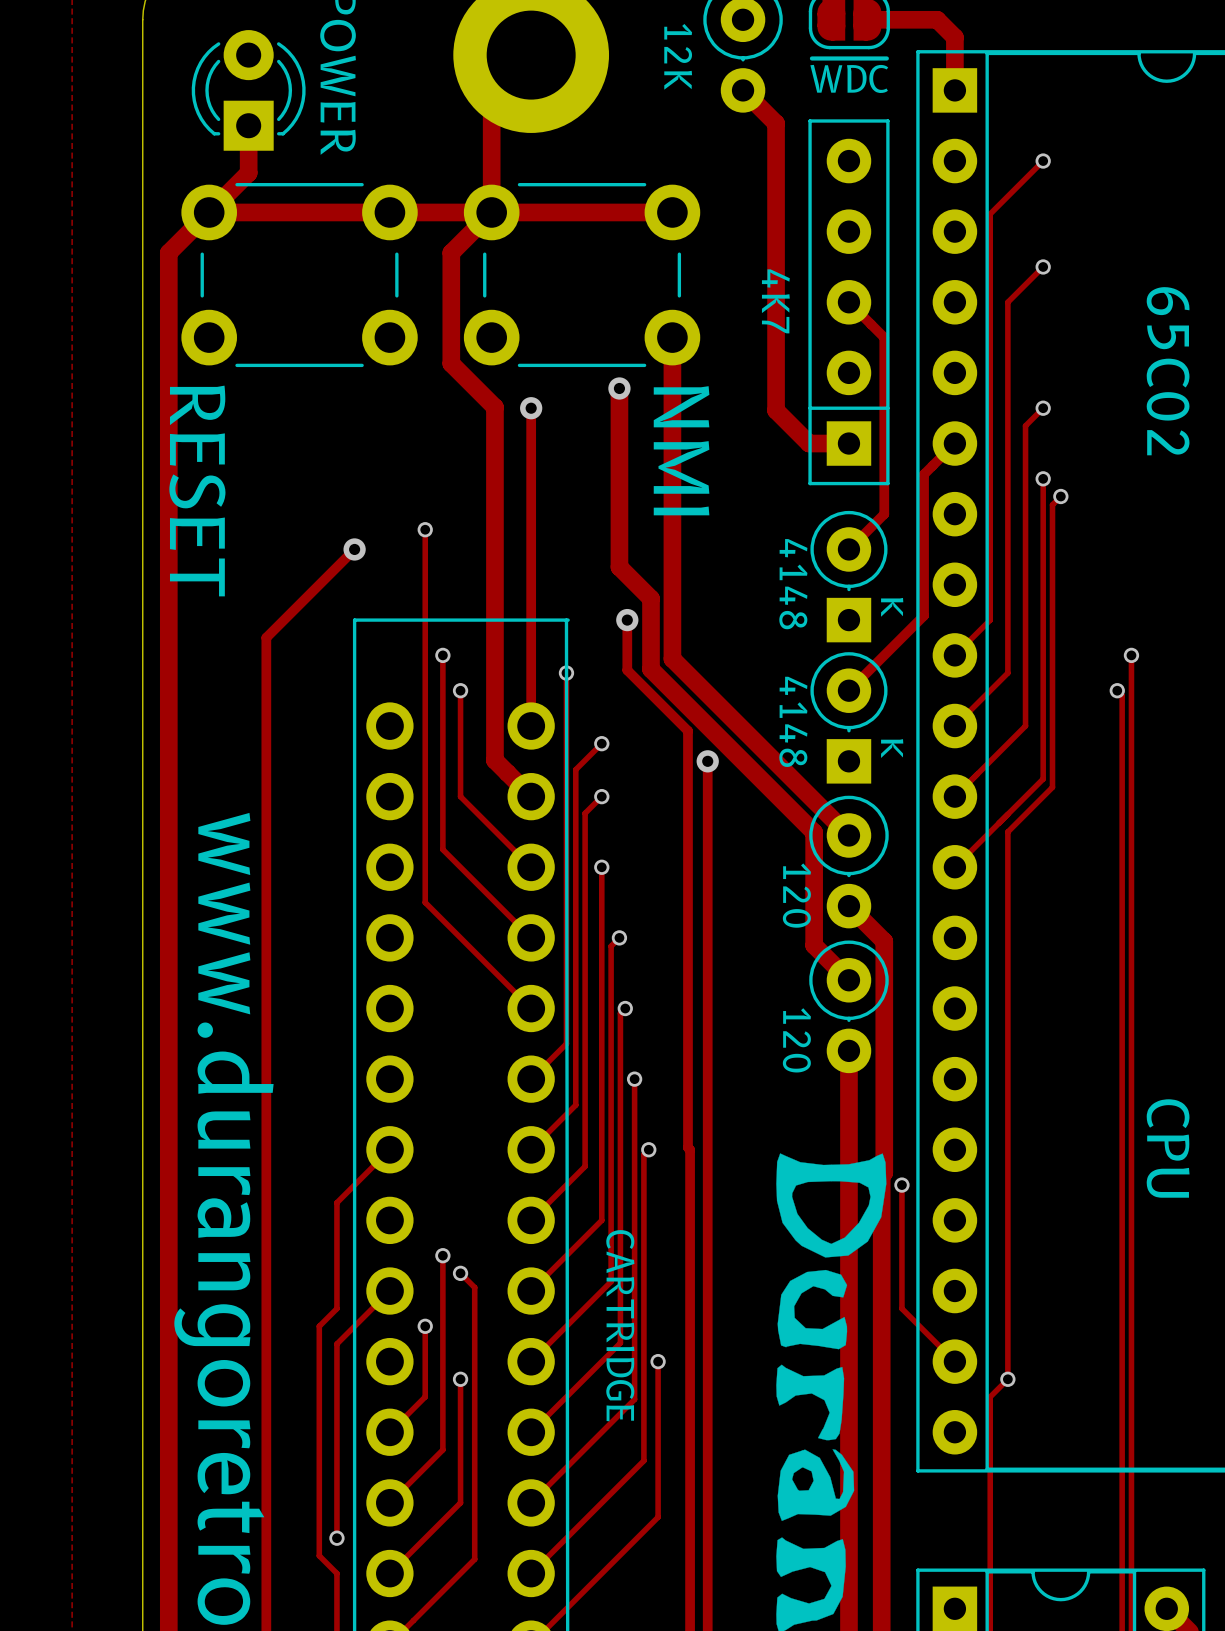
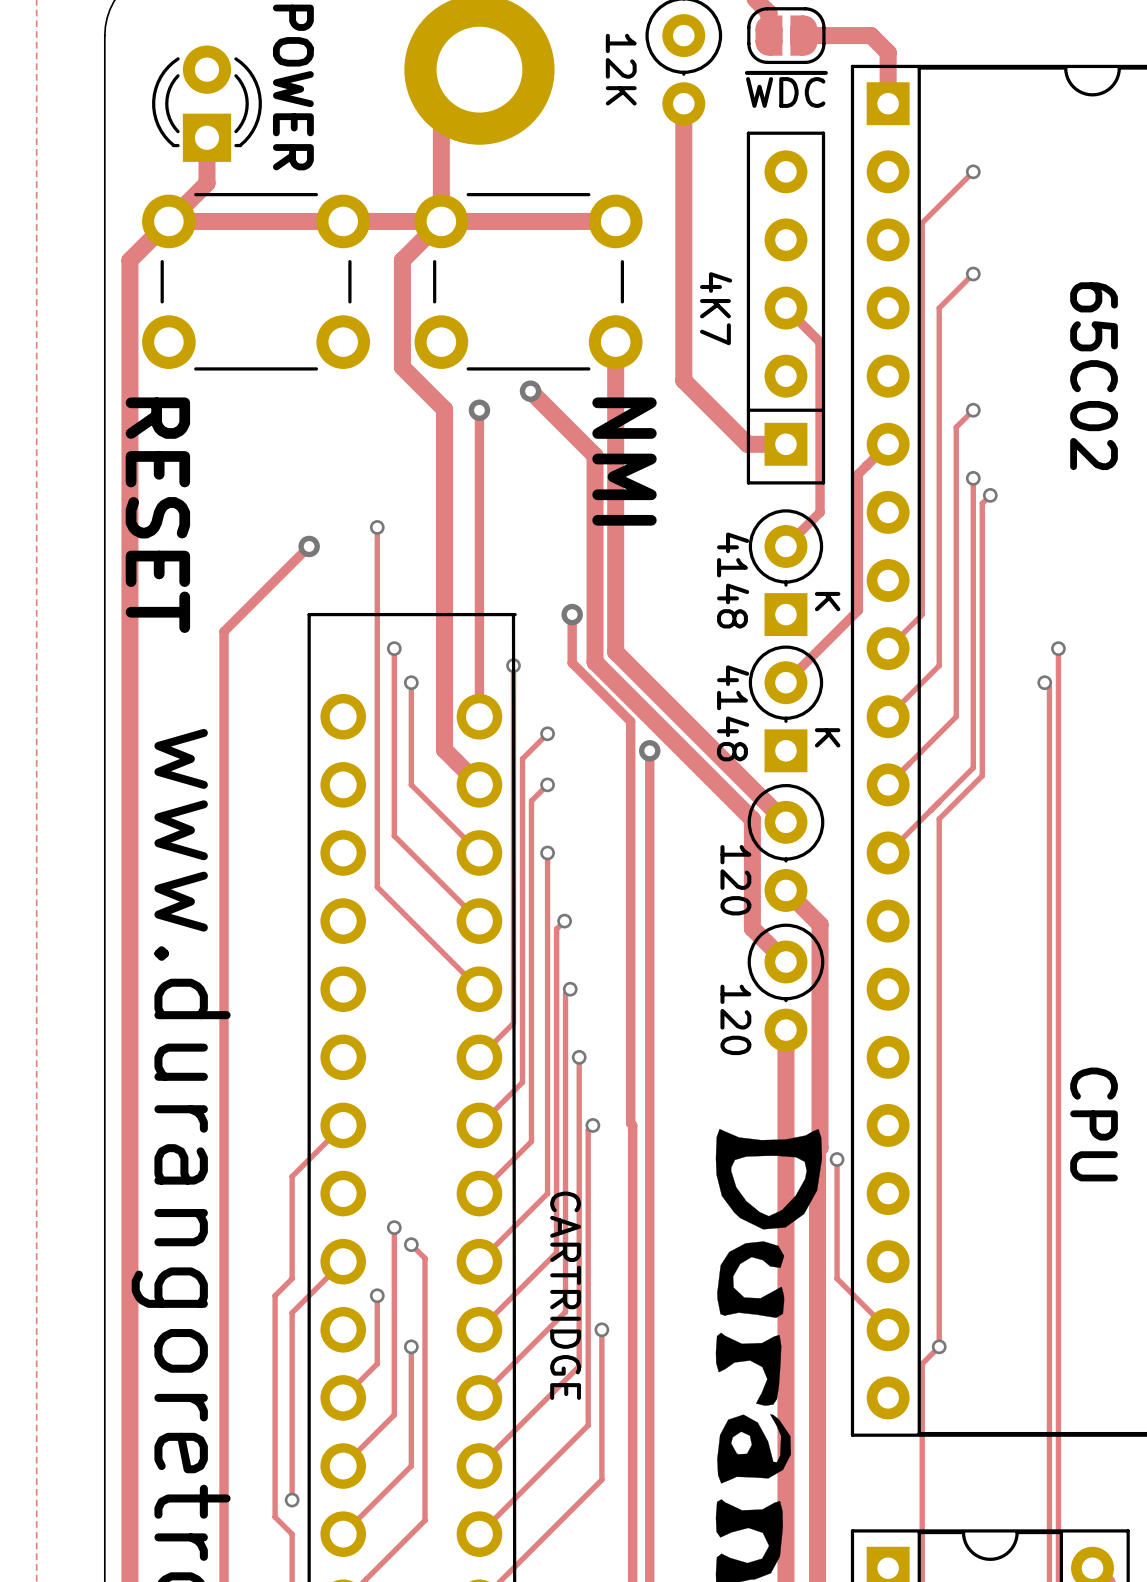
track: (743, 90) (776, 123) (776, 410) -> (683, 103) (683, 380) (715, 412)
track: (619, 388) (619, 567) (651, 598) -> (530, 391) (595, 455) (595, 593)
via position: (619, 388) -> (530, 391)

